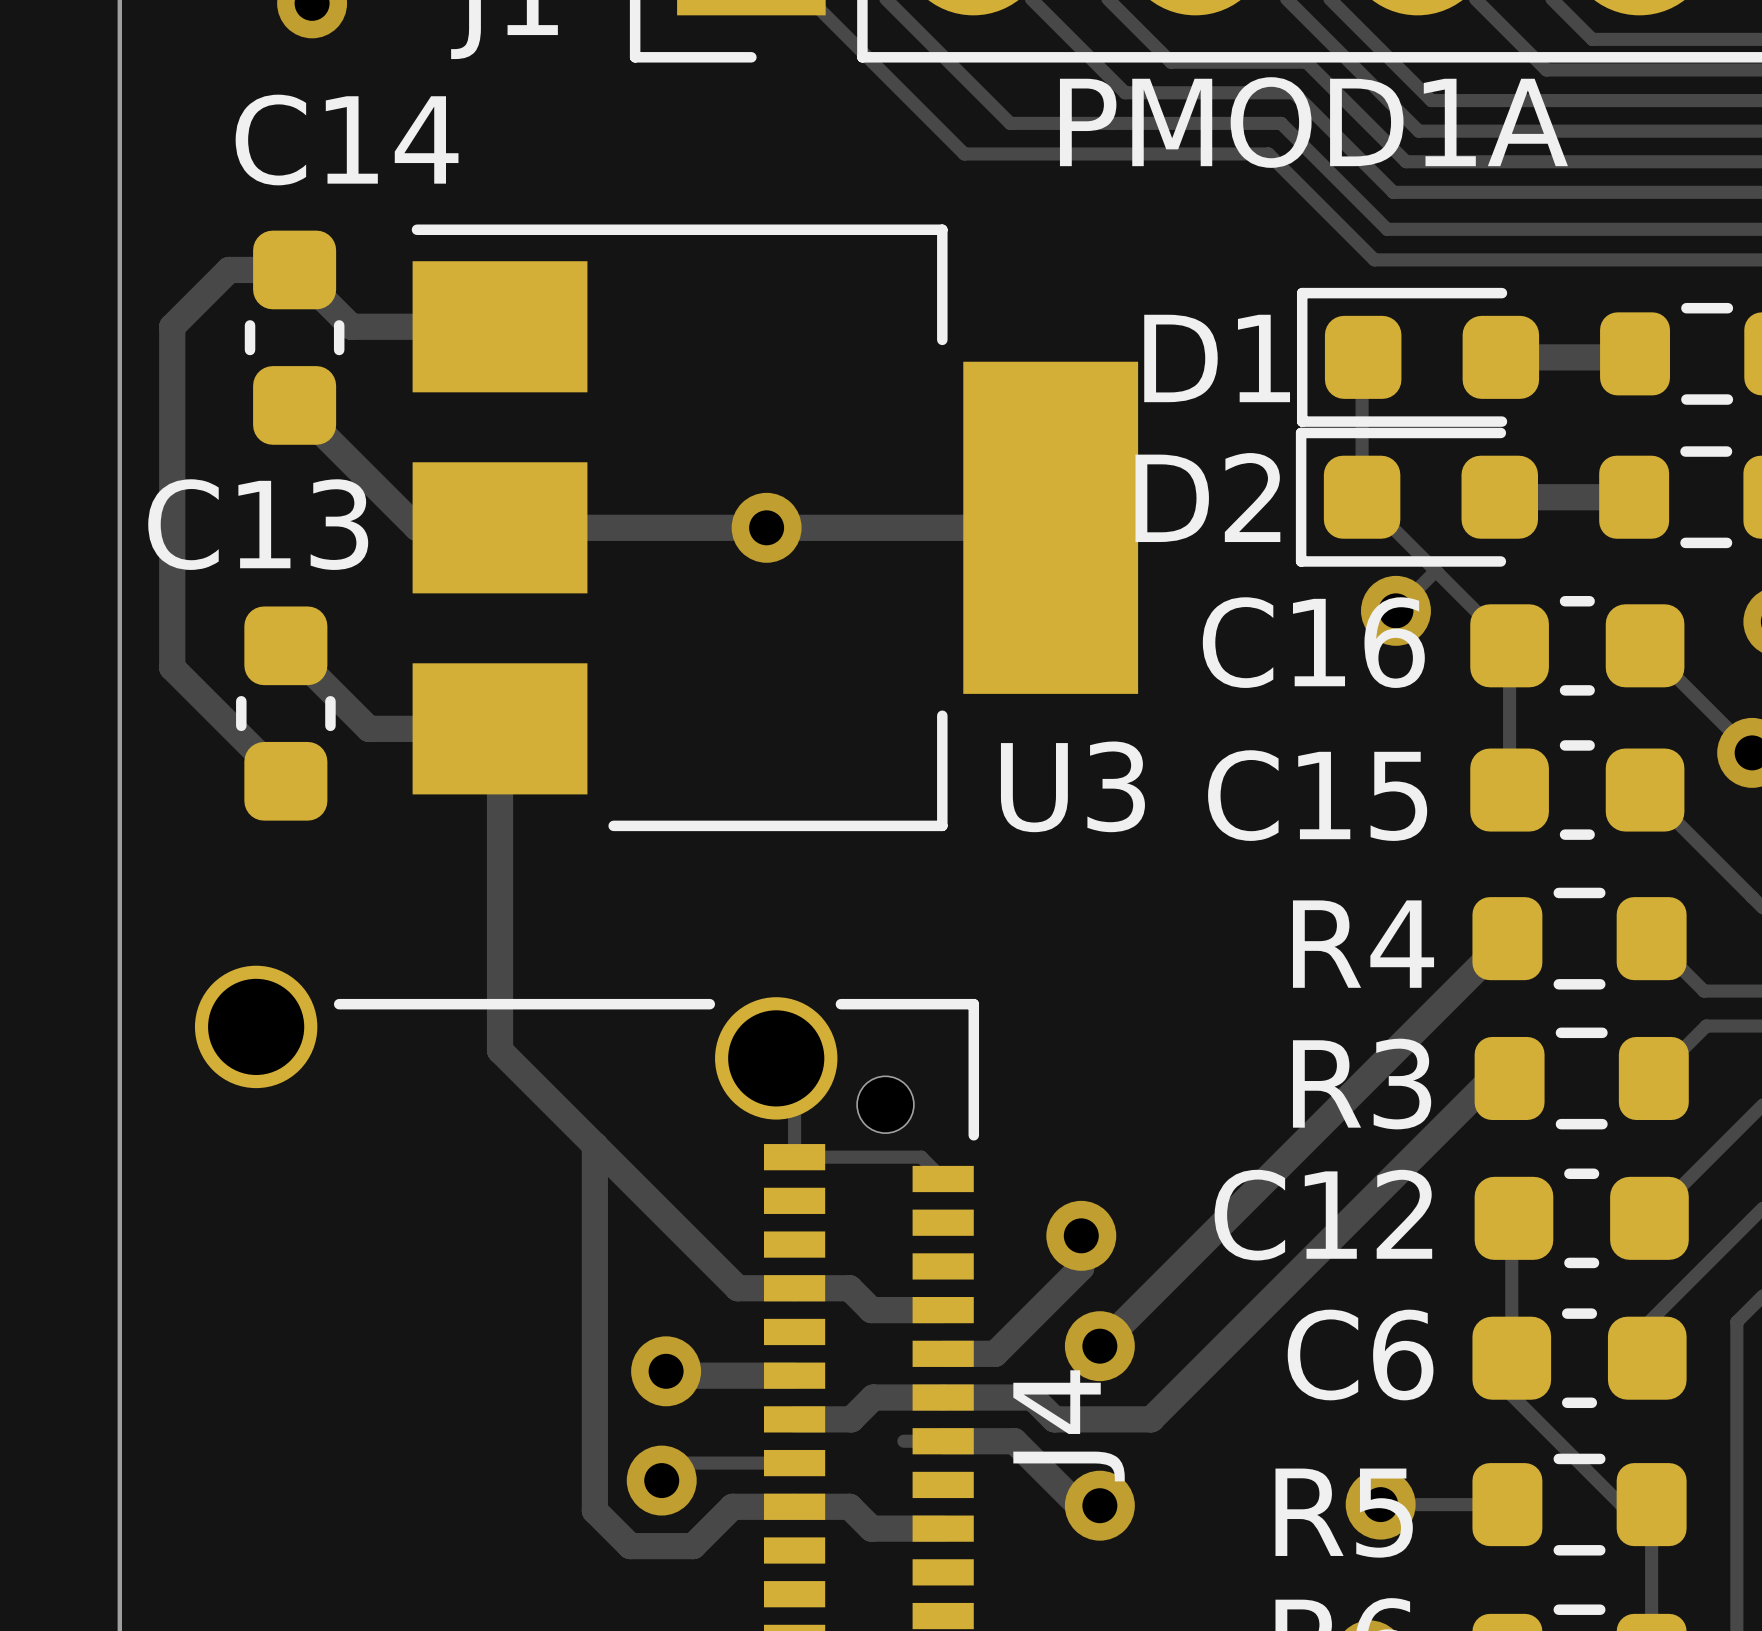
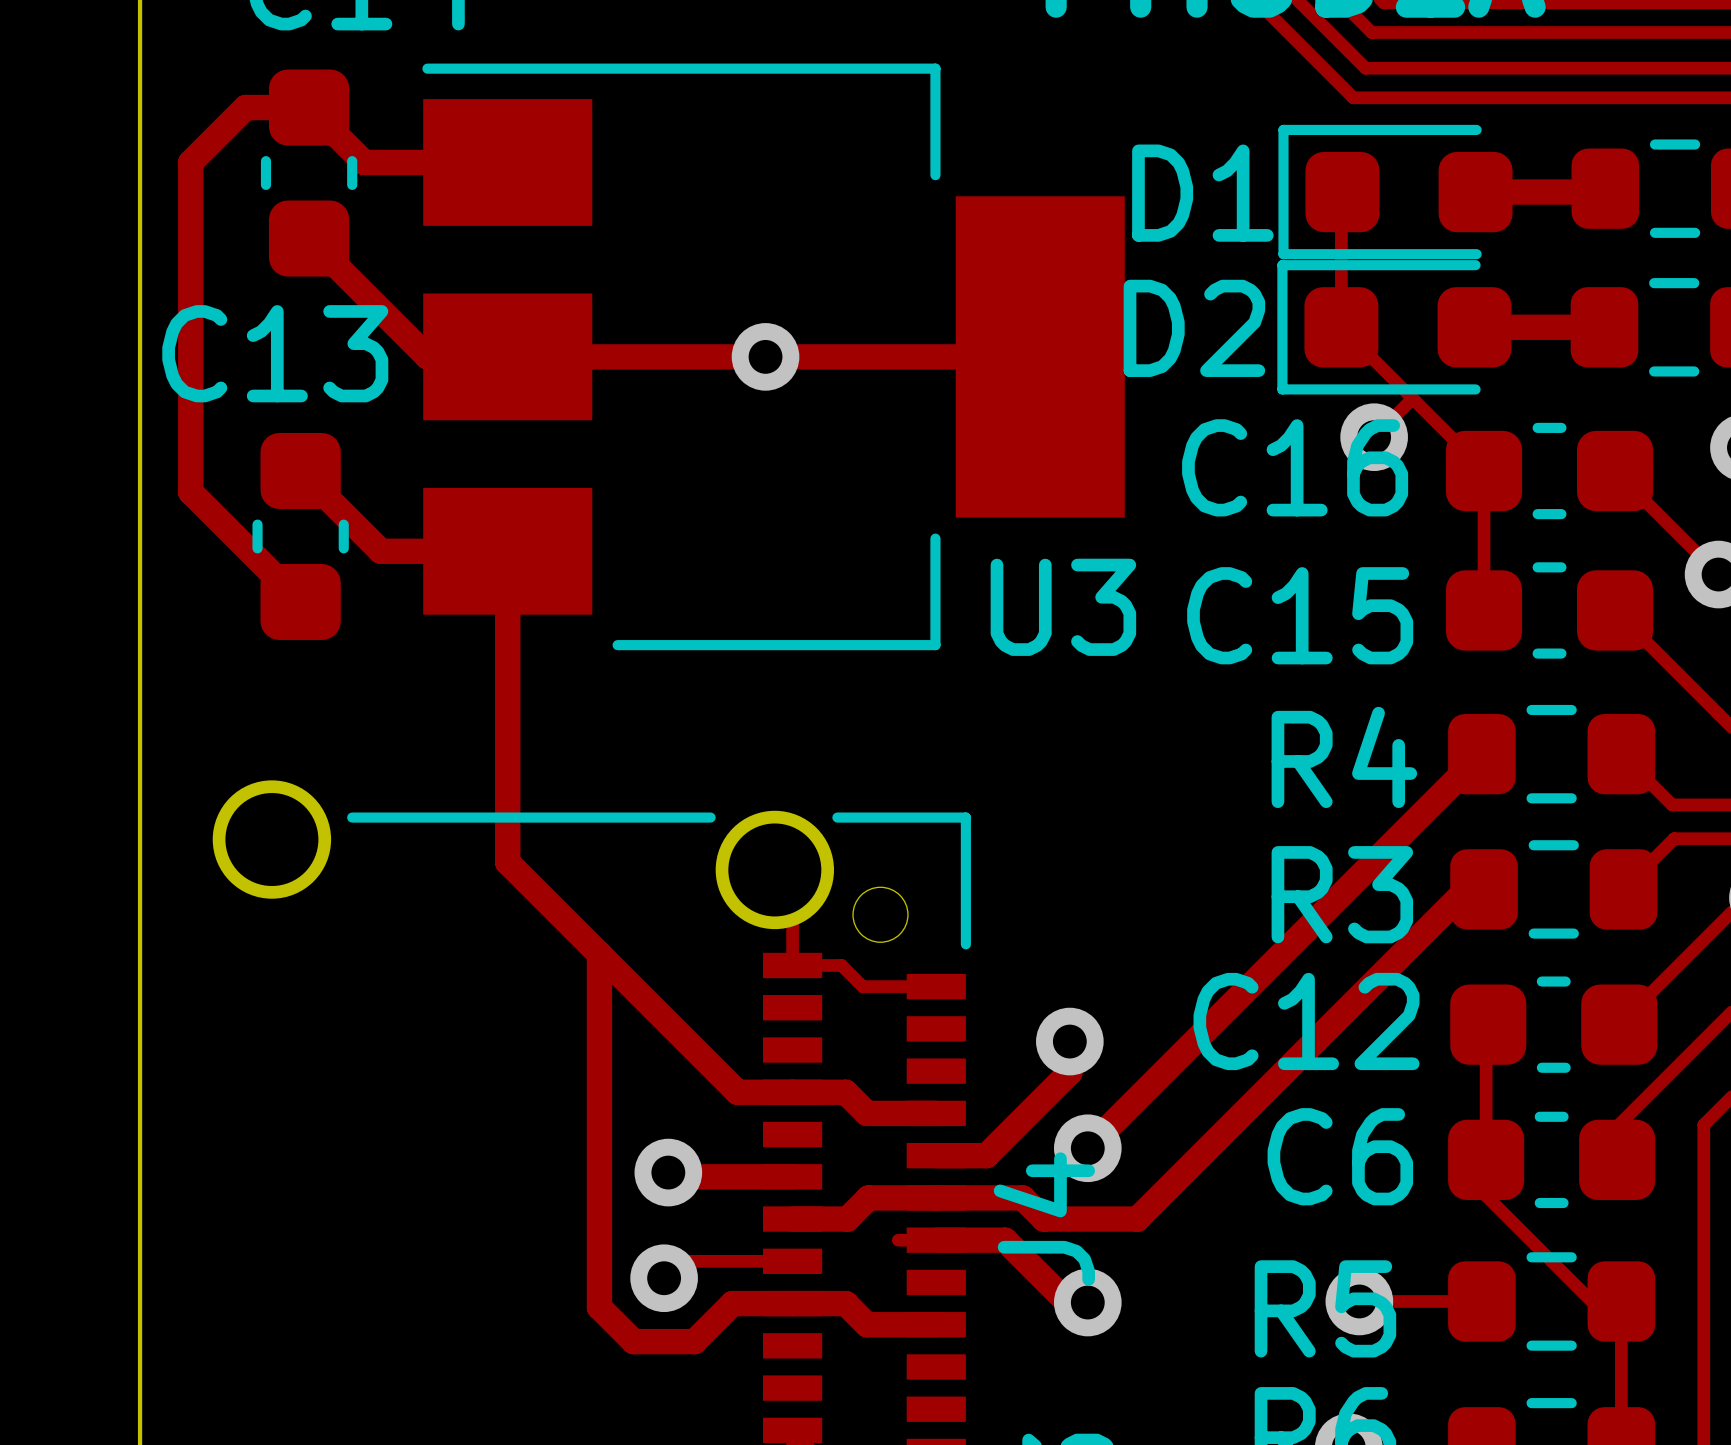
track: (845, 1157) (921, 1157) (943, 1179) -> (841, 965) (862, 986) (936, 986)

